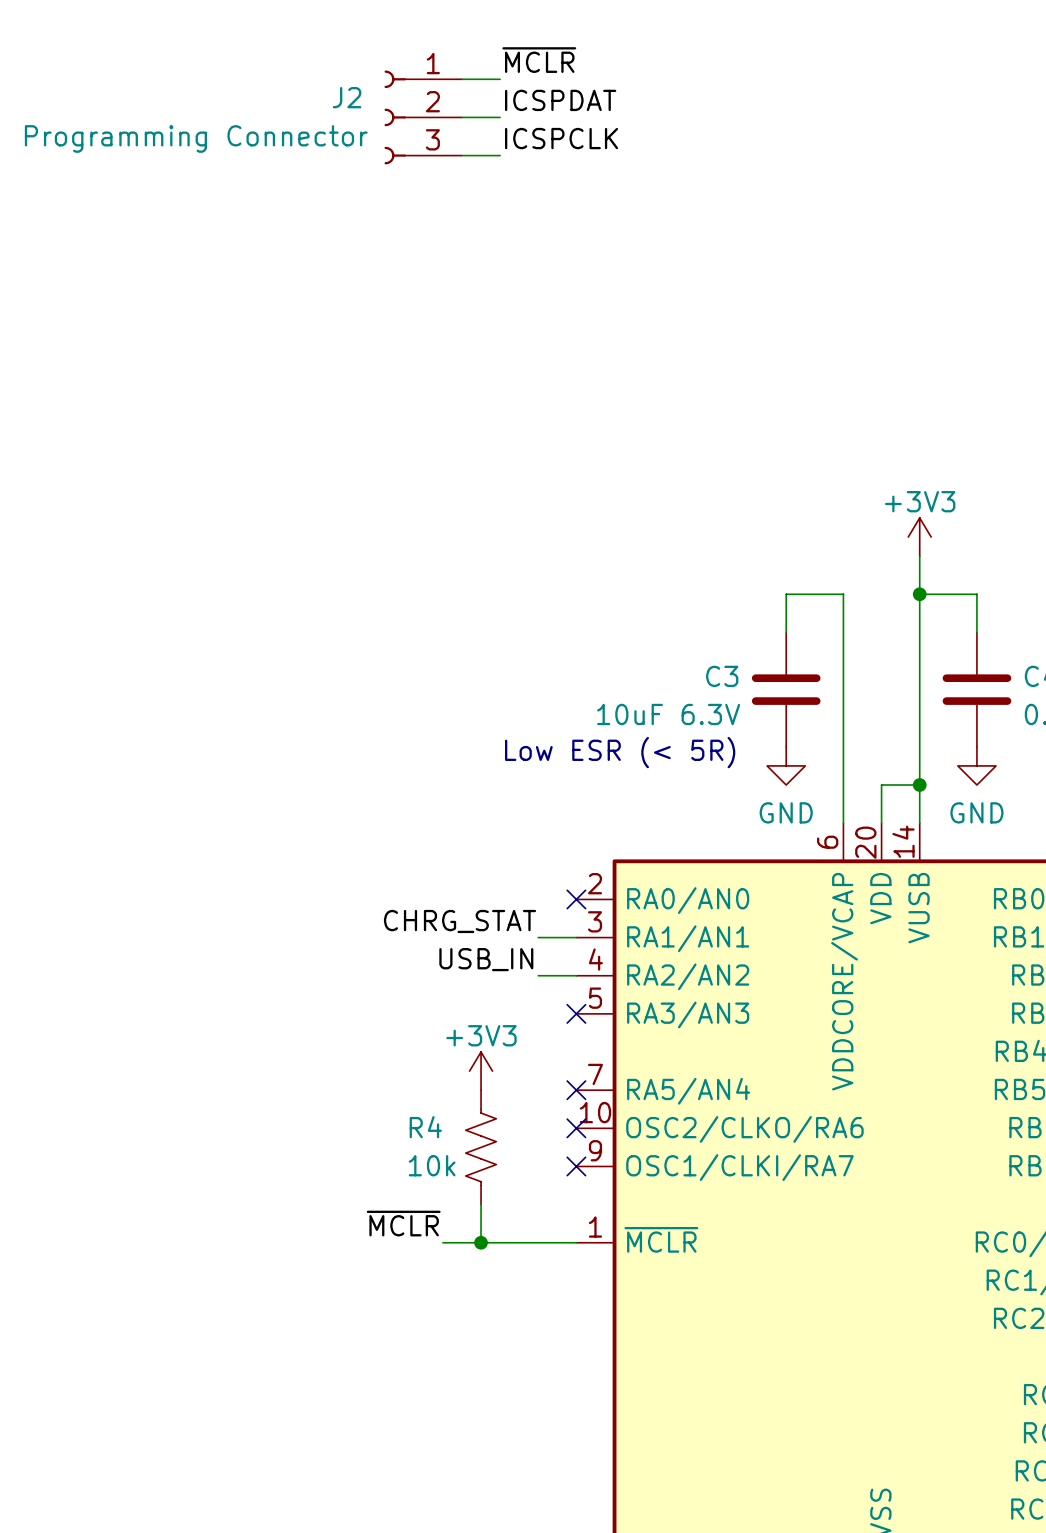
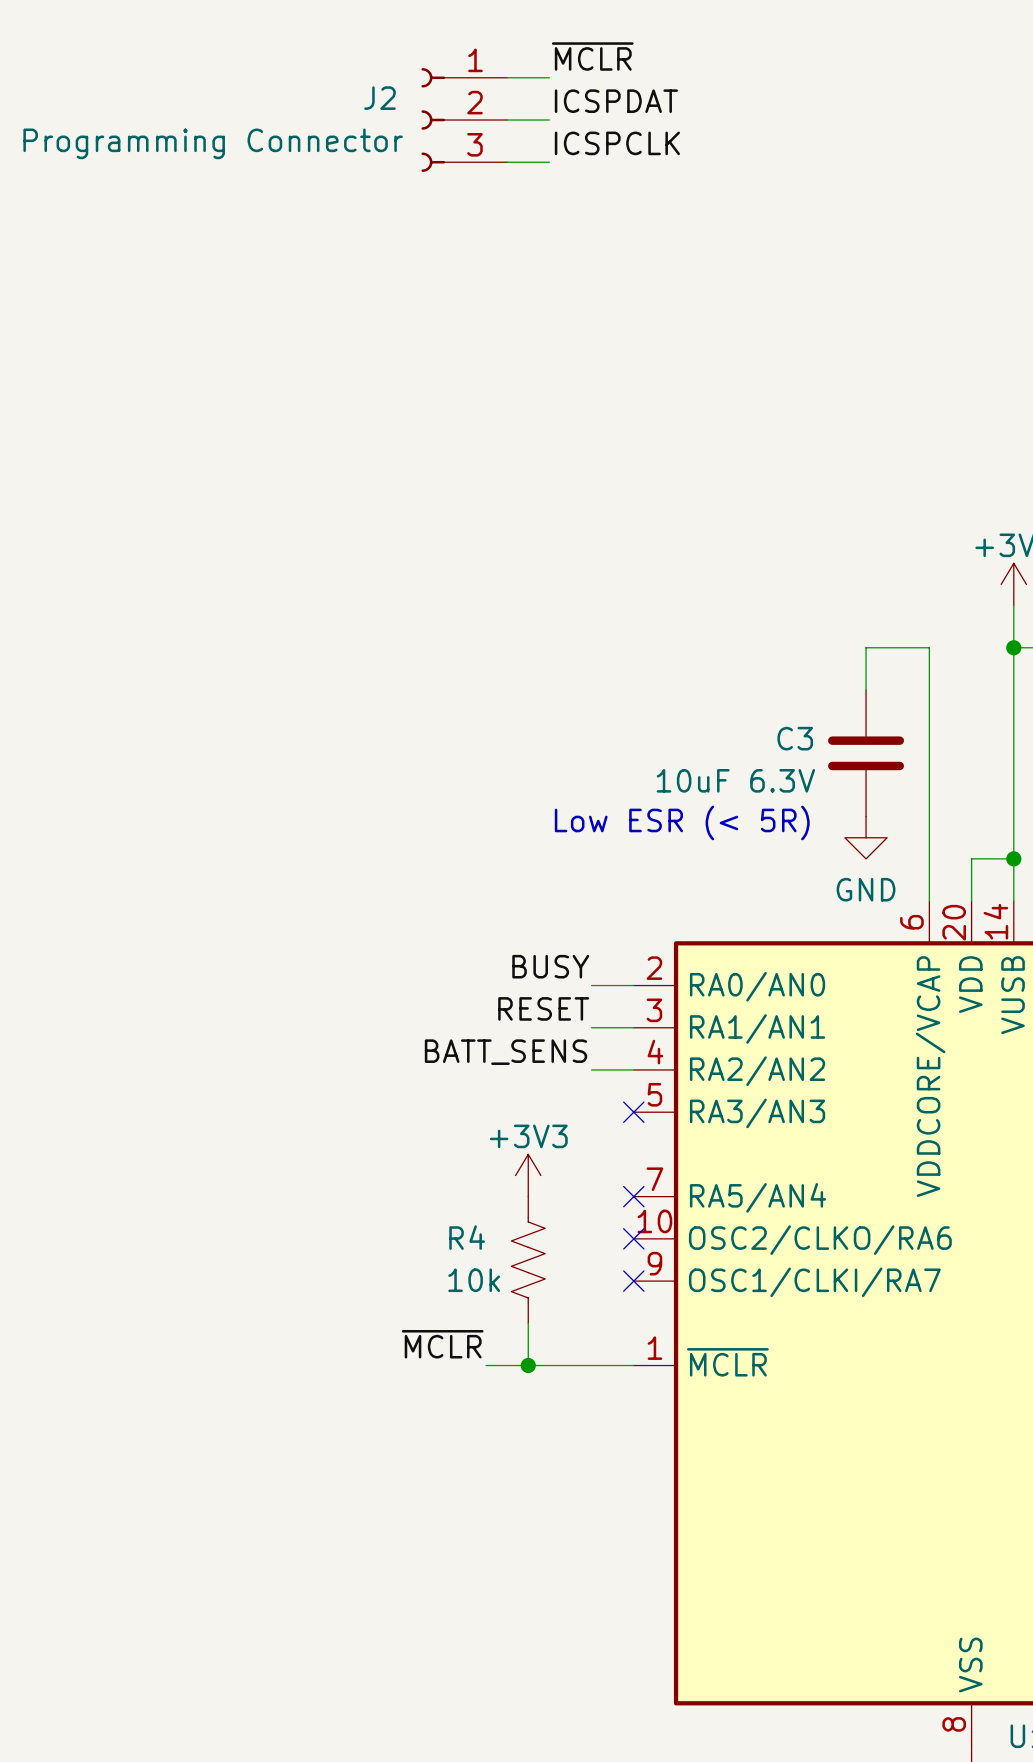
label: none -> BUSY (550, 966)
wire: none -> (591, 985) (633, 985)
no-connect mark: (576, 899) -> none
label: CHRG_STAT (460, 921) -> RESET (543, 1008)
label: USB_IN (486, 959) -> BATT_SENS (505, 1052)

